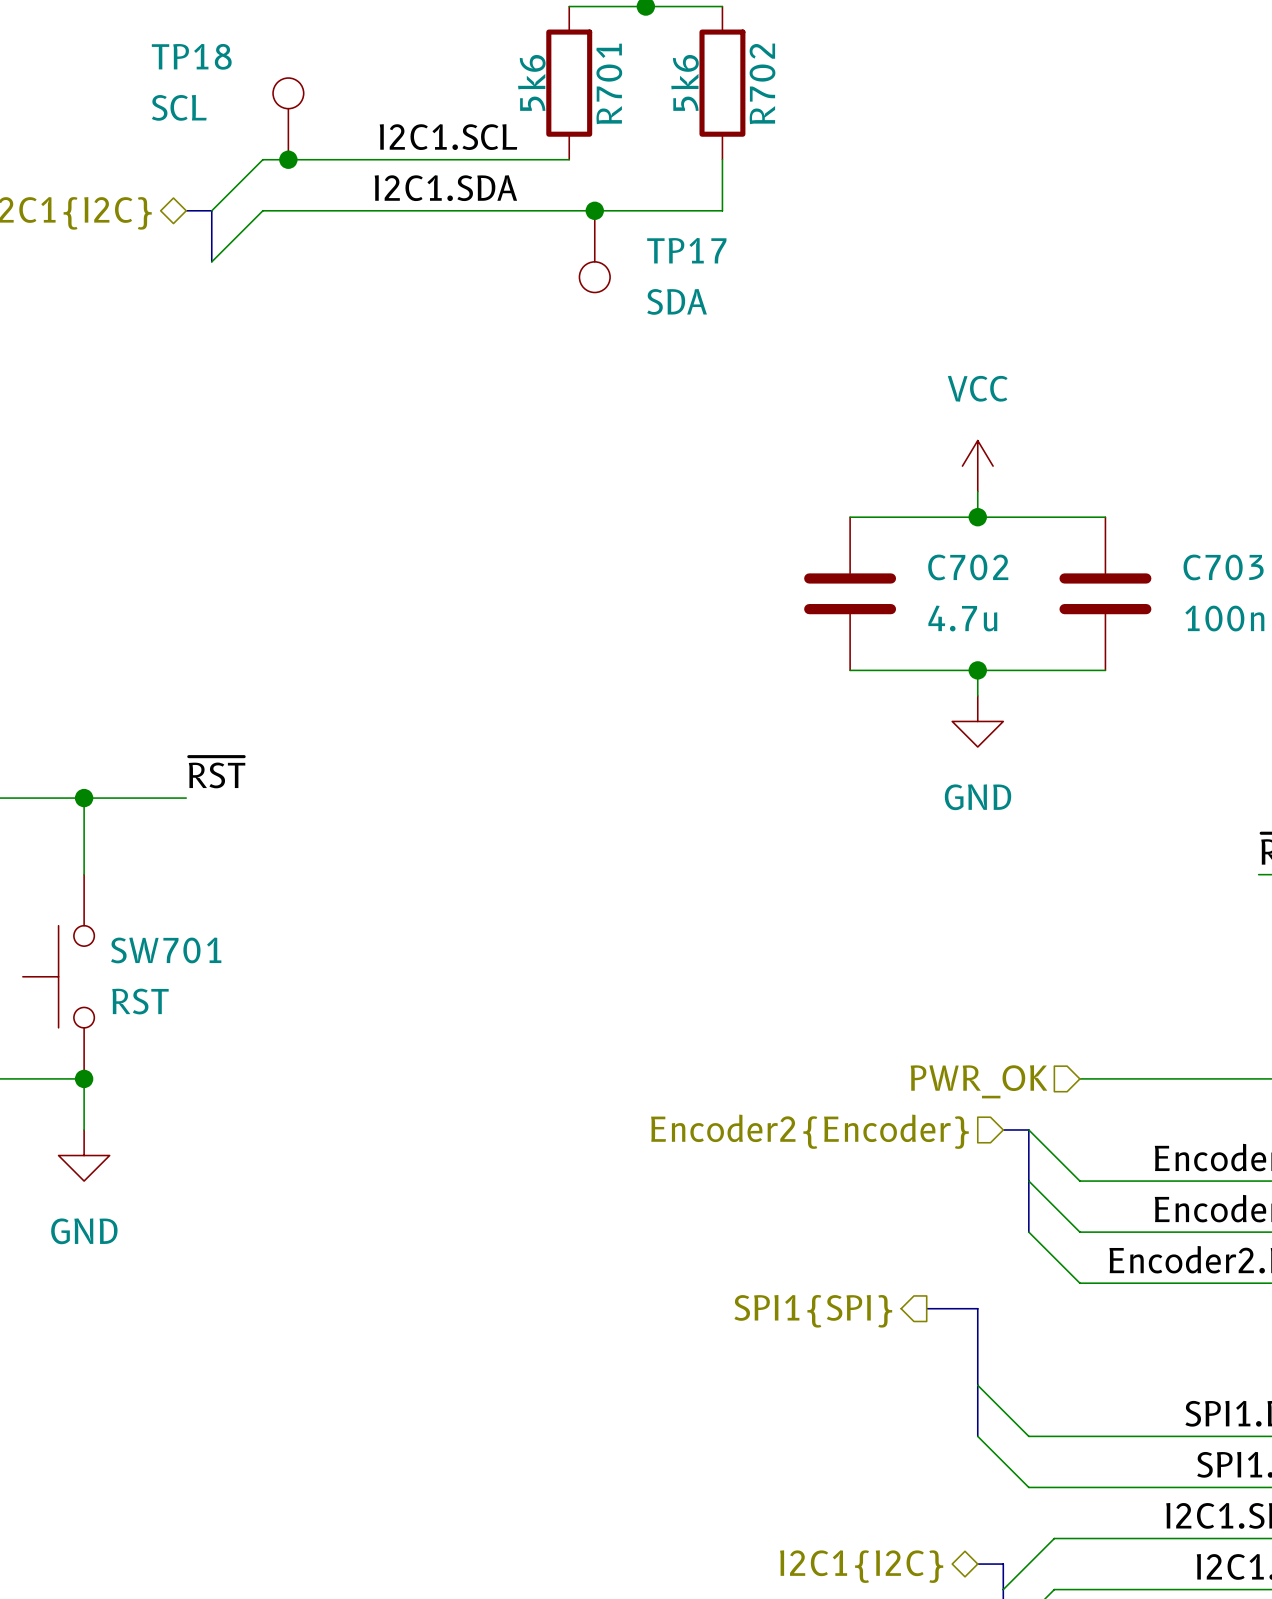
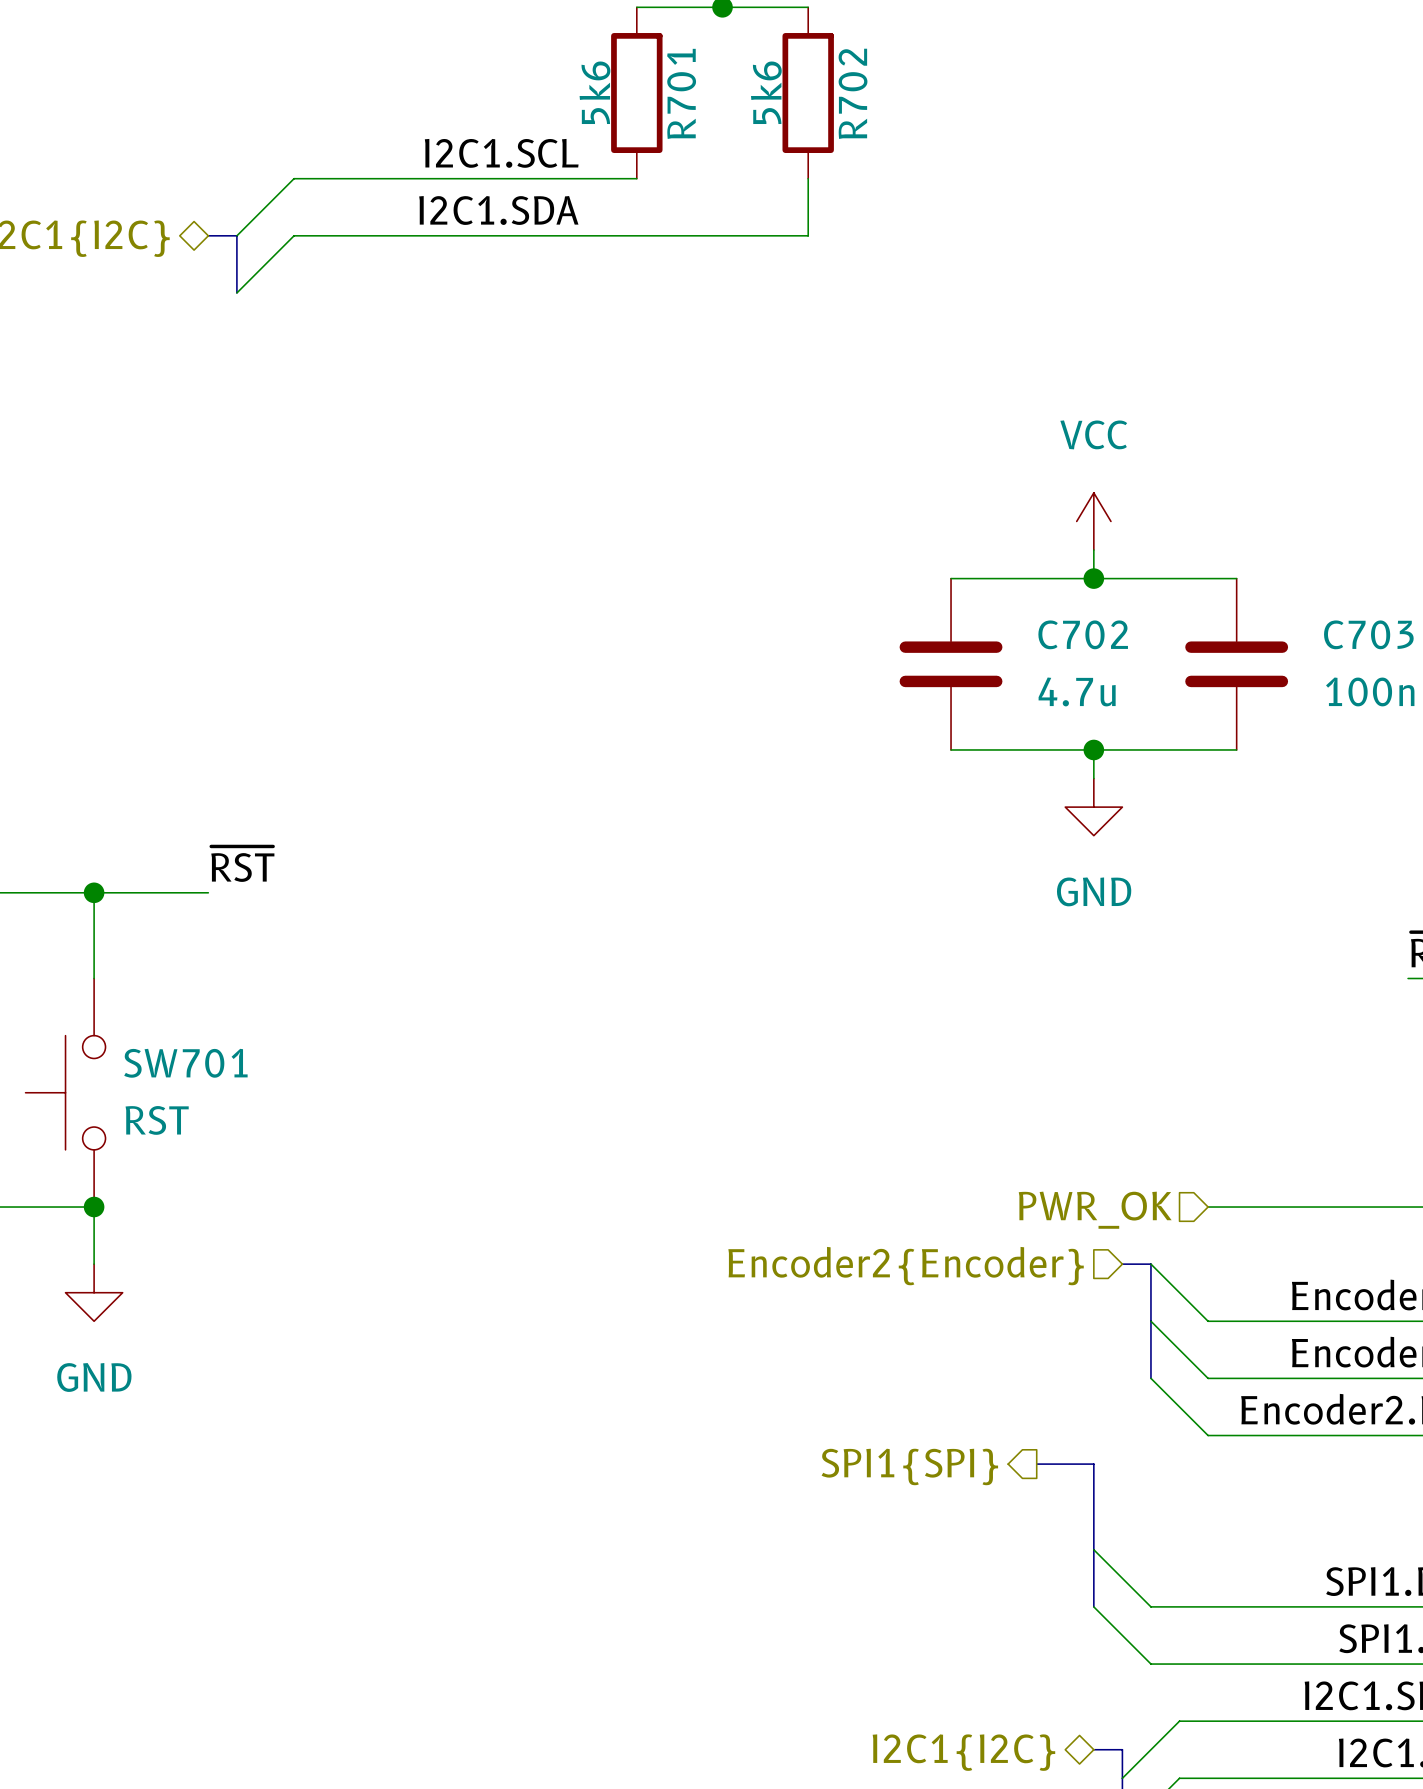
TP18: SCL (288, 118) -> none
junction: (288, 159) -> none
junction: (594, 210) -> none
TP17: SDA (594, 251) -> none

